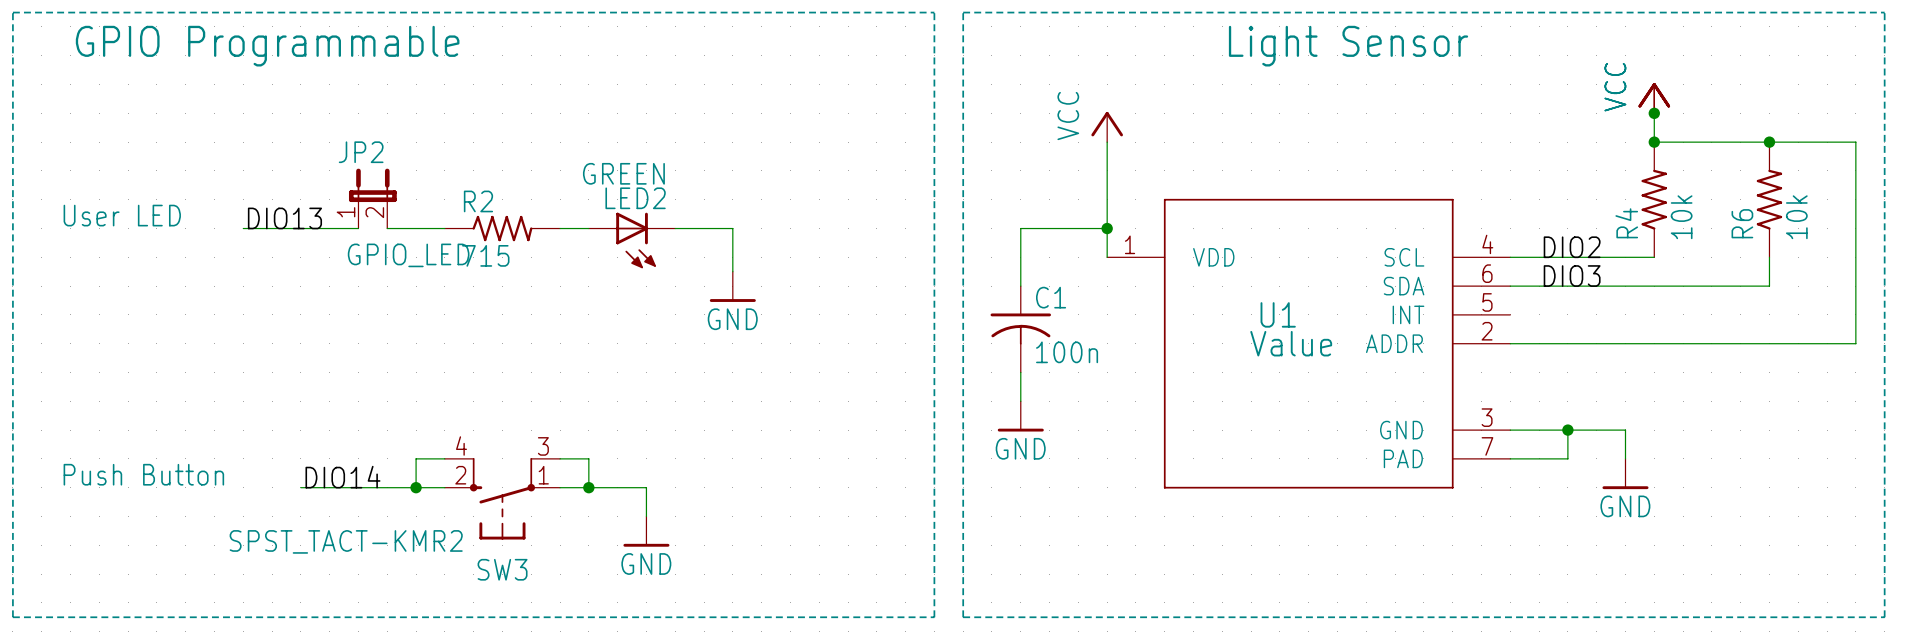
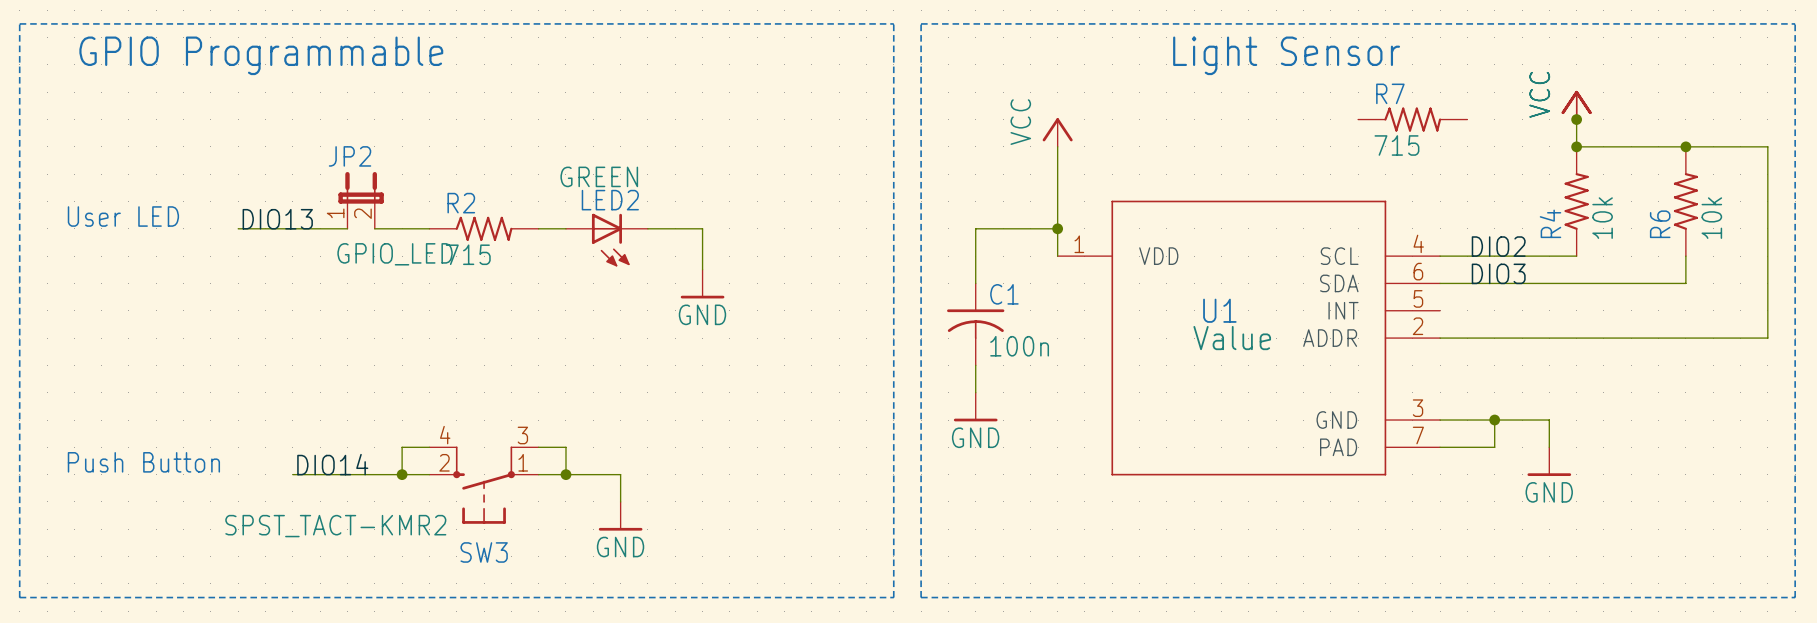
R7: none -> 715 (1412, 119)

